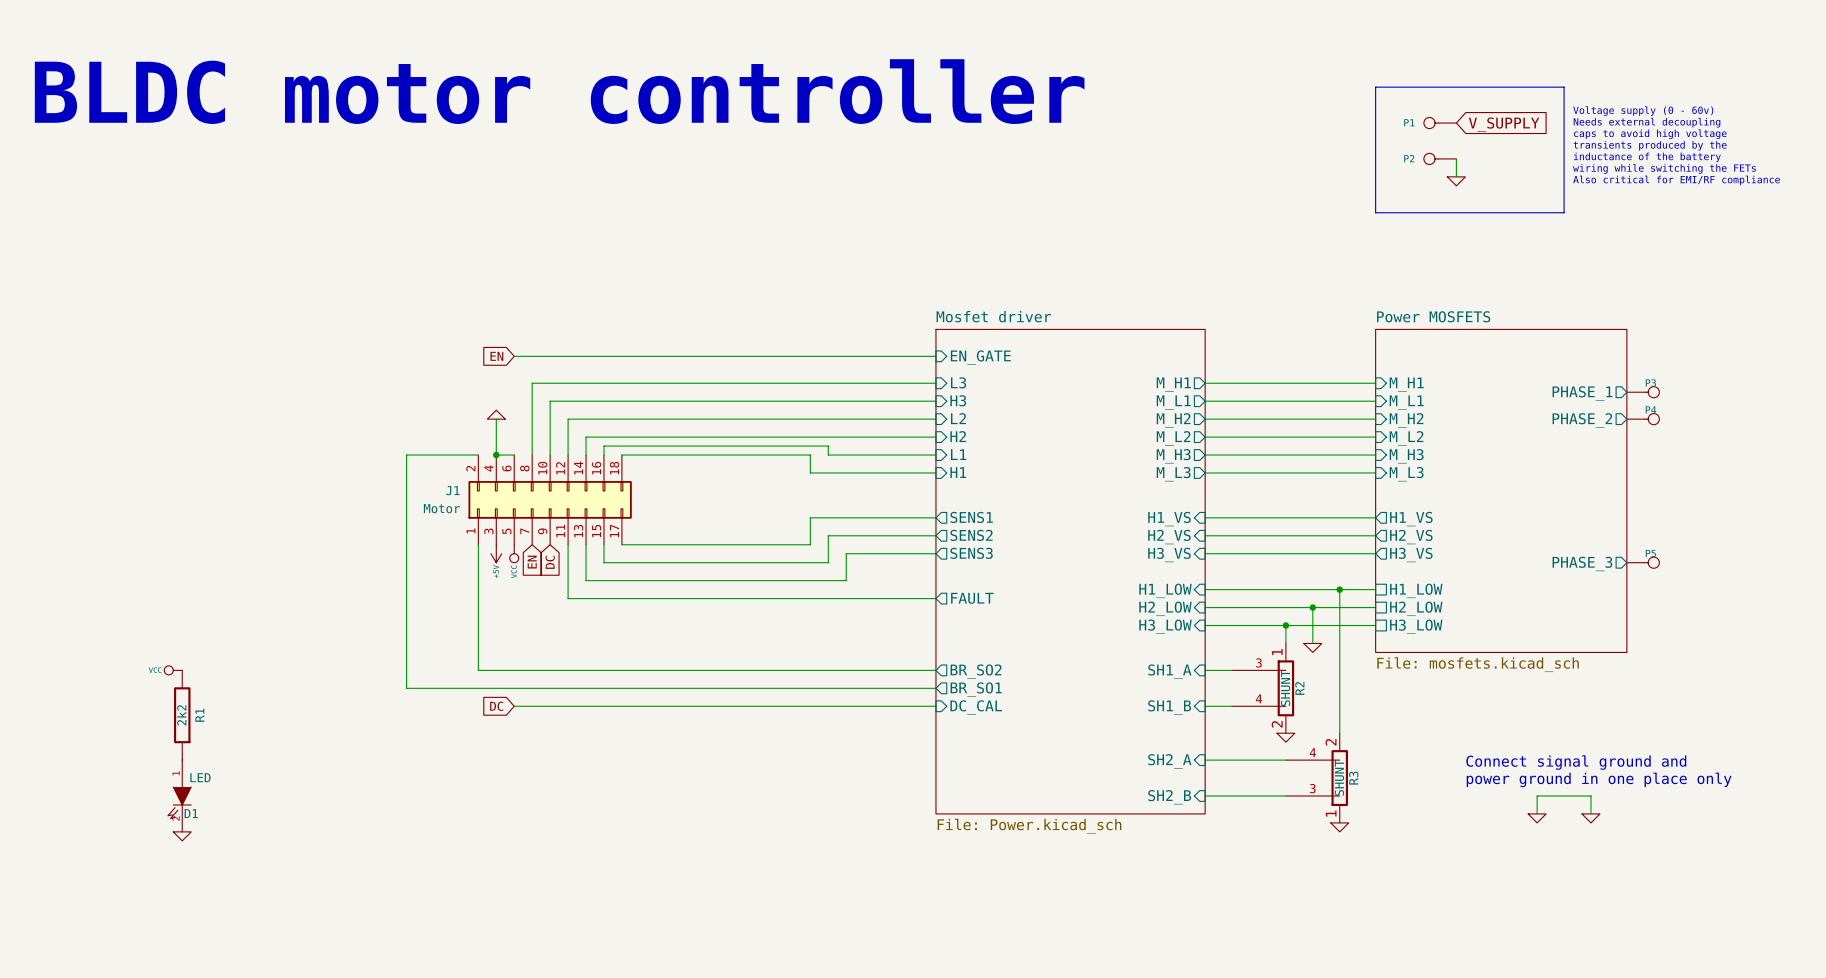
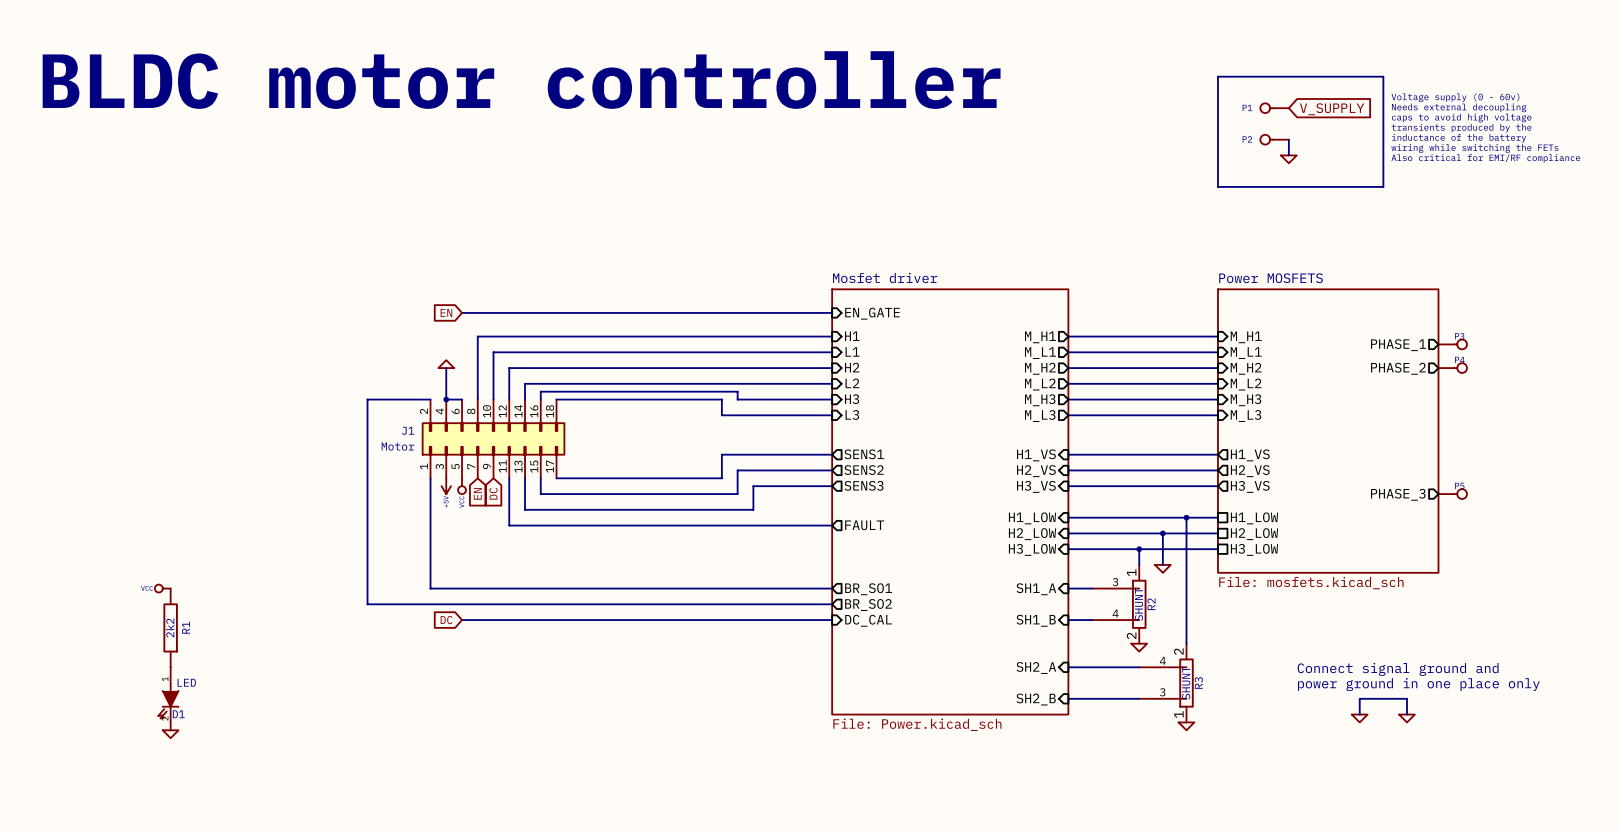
sheet pin: L3 (958, 382) -> H1 (852, 336)
sheet pin: H3 (958, 400) -> L1 (852, 351)
sheet pin: L2 (958, 418) -> H2 (852, 367)
sheet pin: H2 (958, 436) -> L2 (852, 383)
sheet pin: L1 (958, 454) -> H3 (852, 399)
sheet pin: H1 (958, 472) -> L3 (852, 414)
sheet pin: BR_SO2 (976, 671) -> BR_SO1 (868, 589)
sheet pin: BR_SO1 (976, 689) -> BR_SO2 (868, 605)

